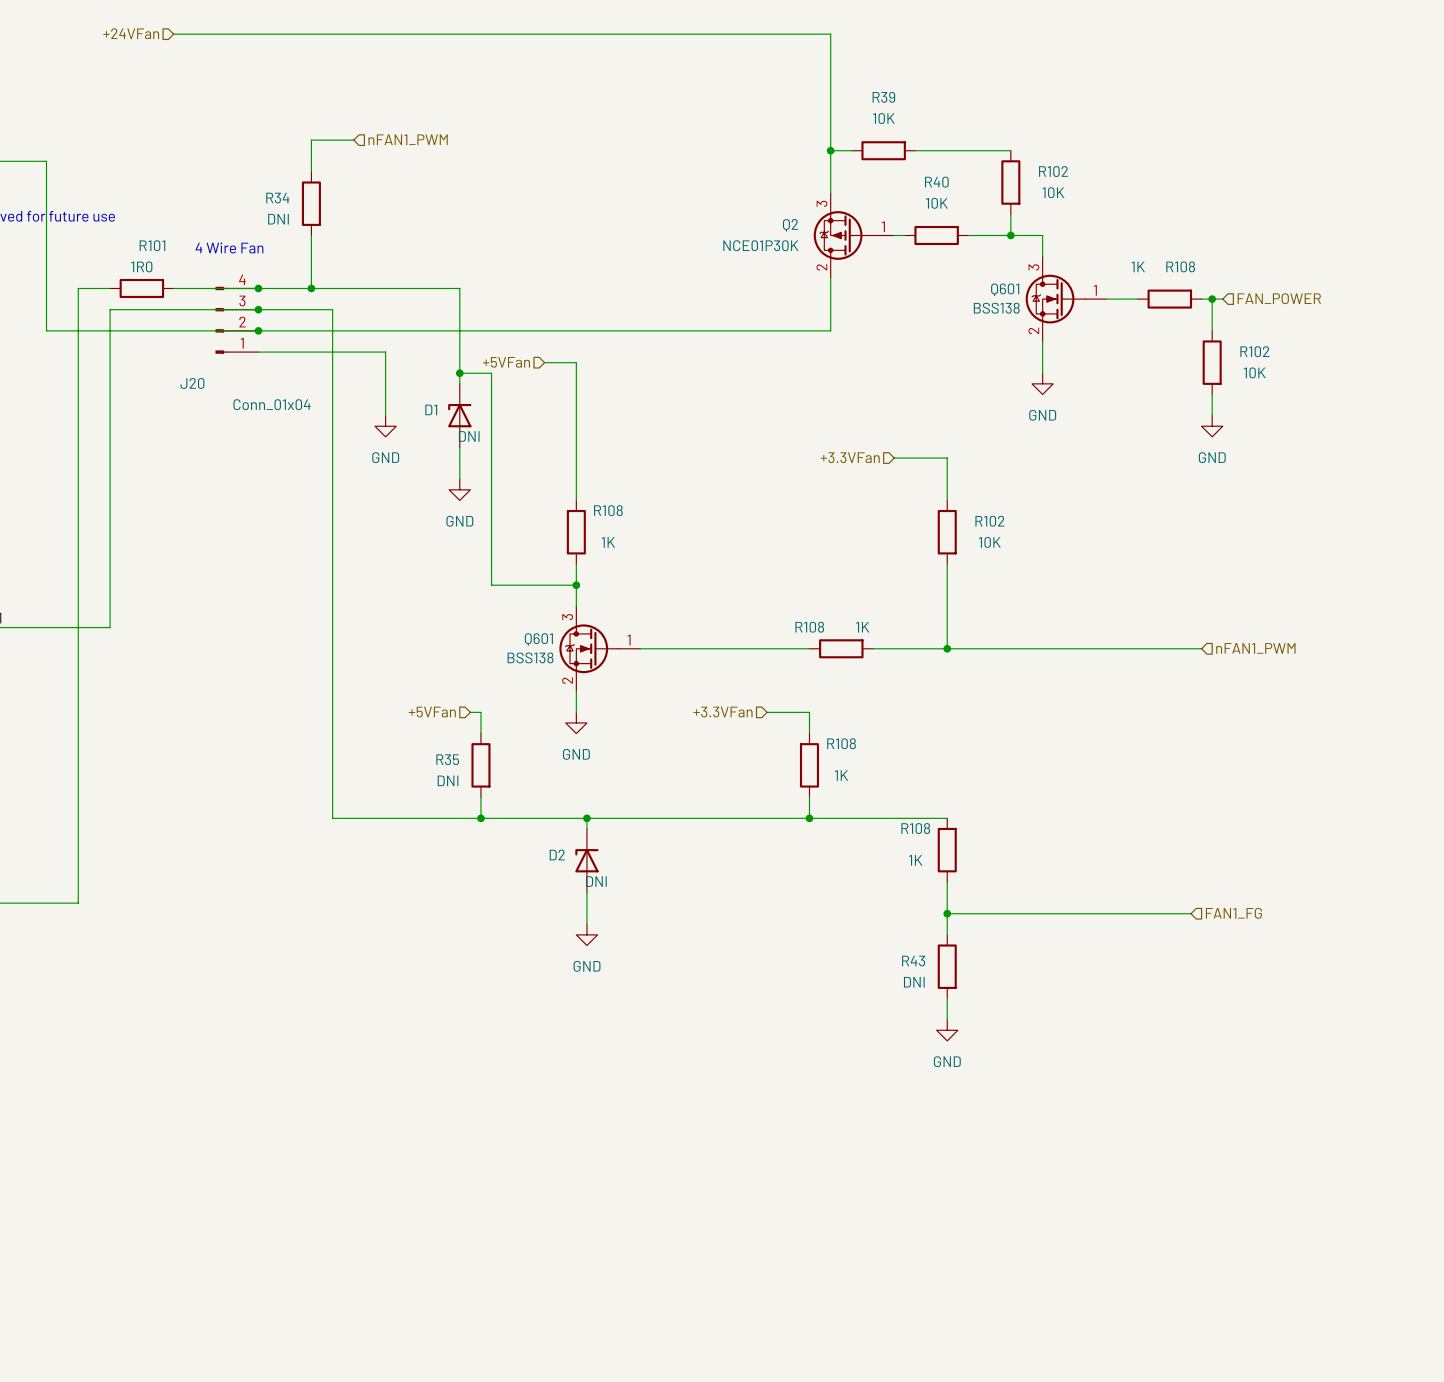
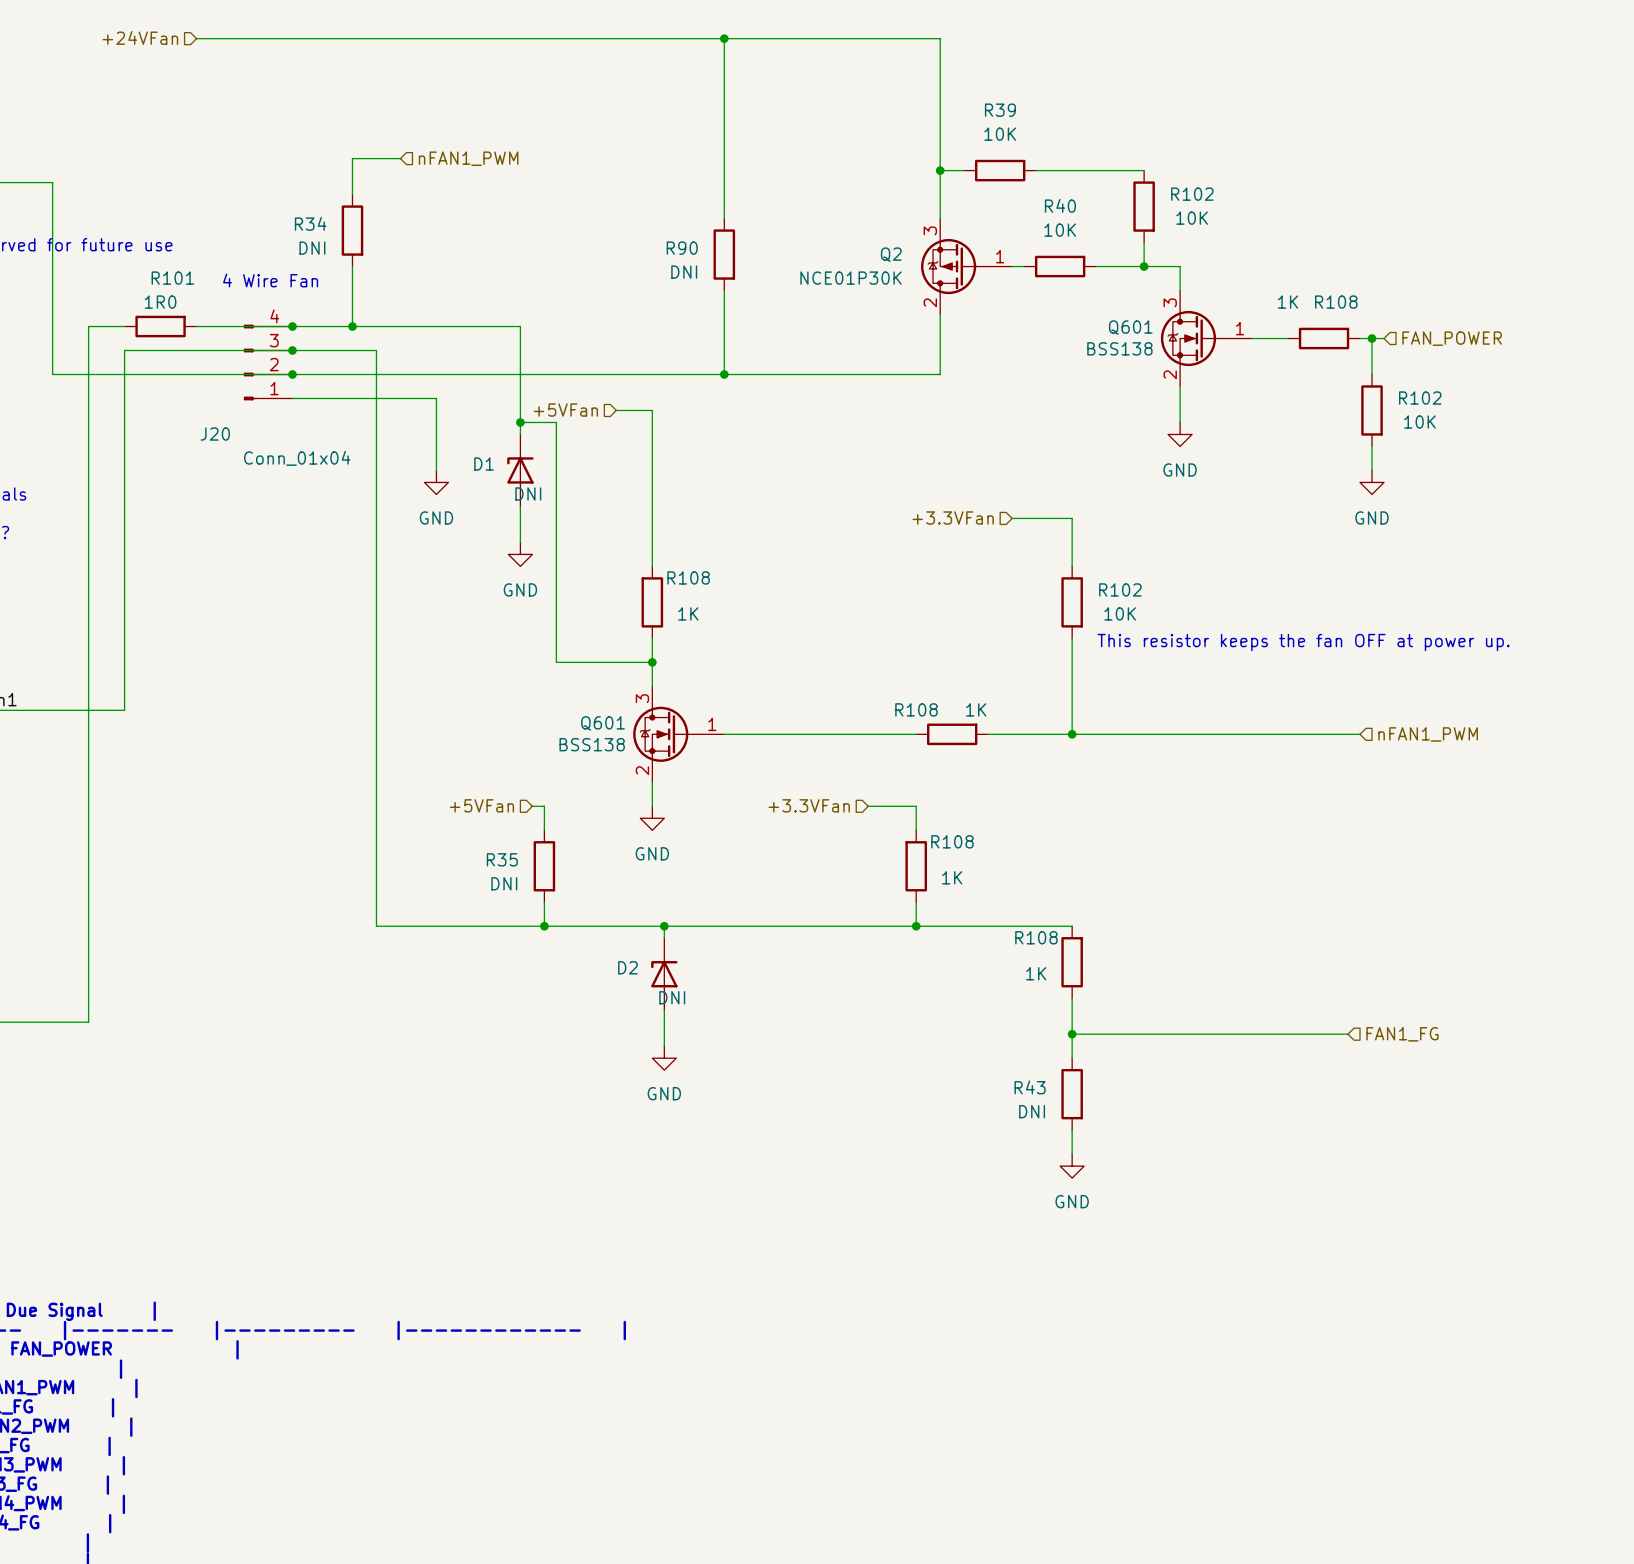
wire: none -> (724, 38) (724, 218)
junction: none -> (724, 38)
R90: none -> DNI (724, 254)
wire: none -> (724, 290) (724, 374)
junction: none -> (724, 374)
text: none -> This resistor keeps the fan OFF at power up. (1303, 642)

